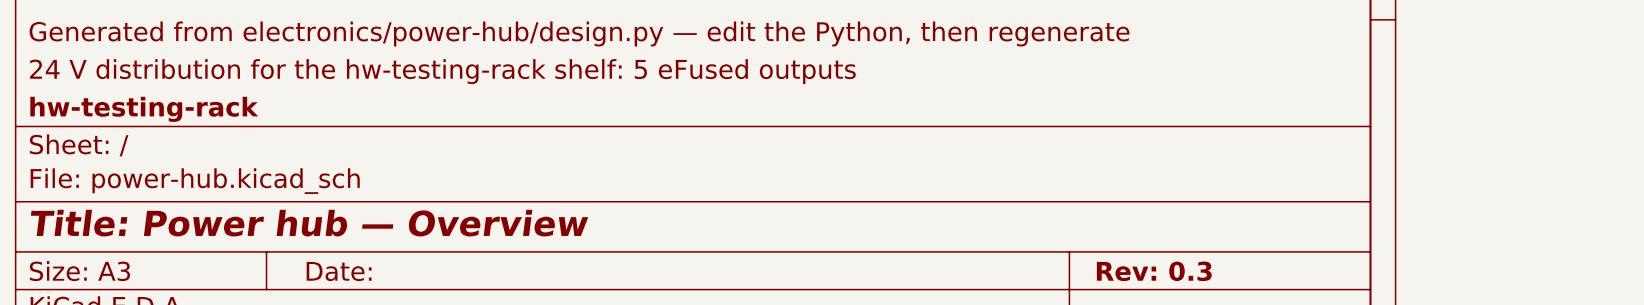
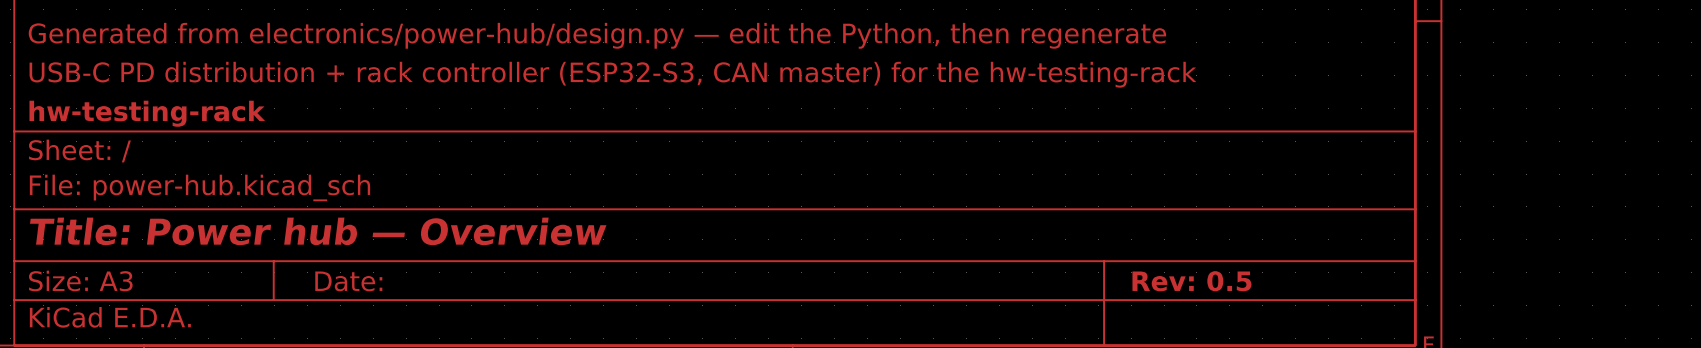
title block: 24 V distribution for the hw-testing-rack shelf: 5 eFused outputs (442, 71) -> USB-C PD distribution + rack controller (ESP32-S3, CAN master) for the hw-testing-rack (612, 74)
title block: Rev: 0.3 (1154, 271) -> Rev: 0.5 (1191, 281)

